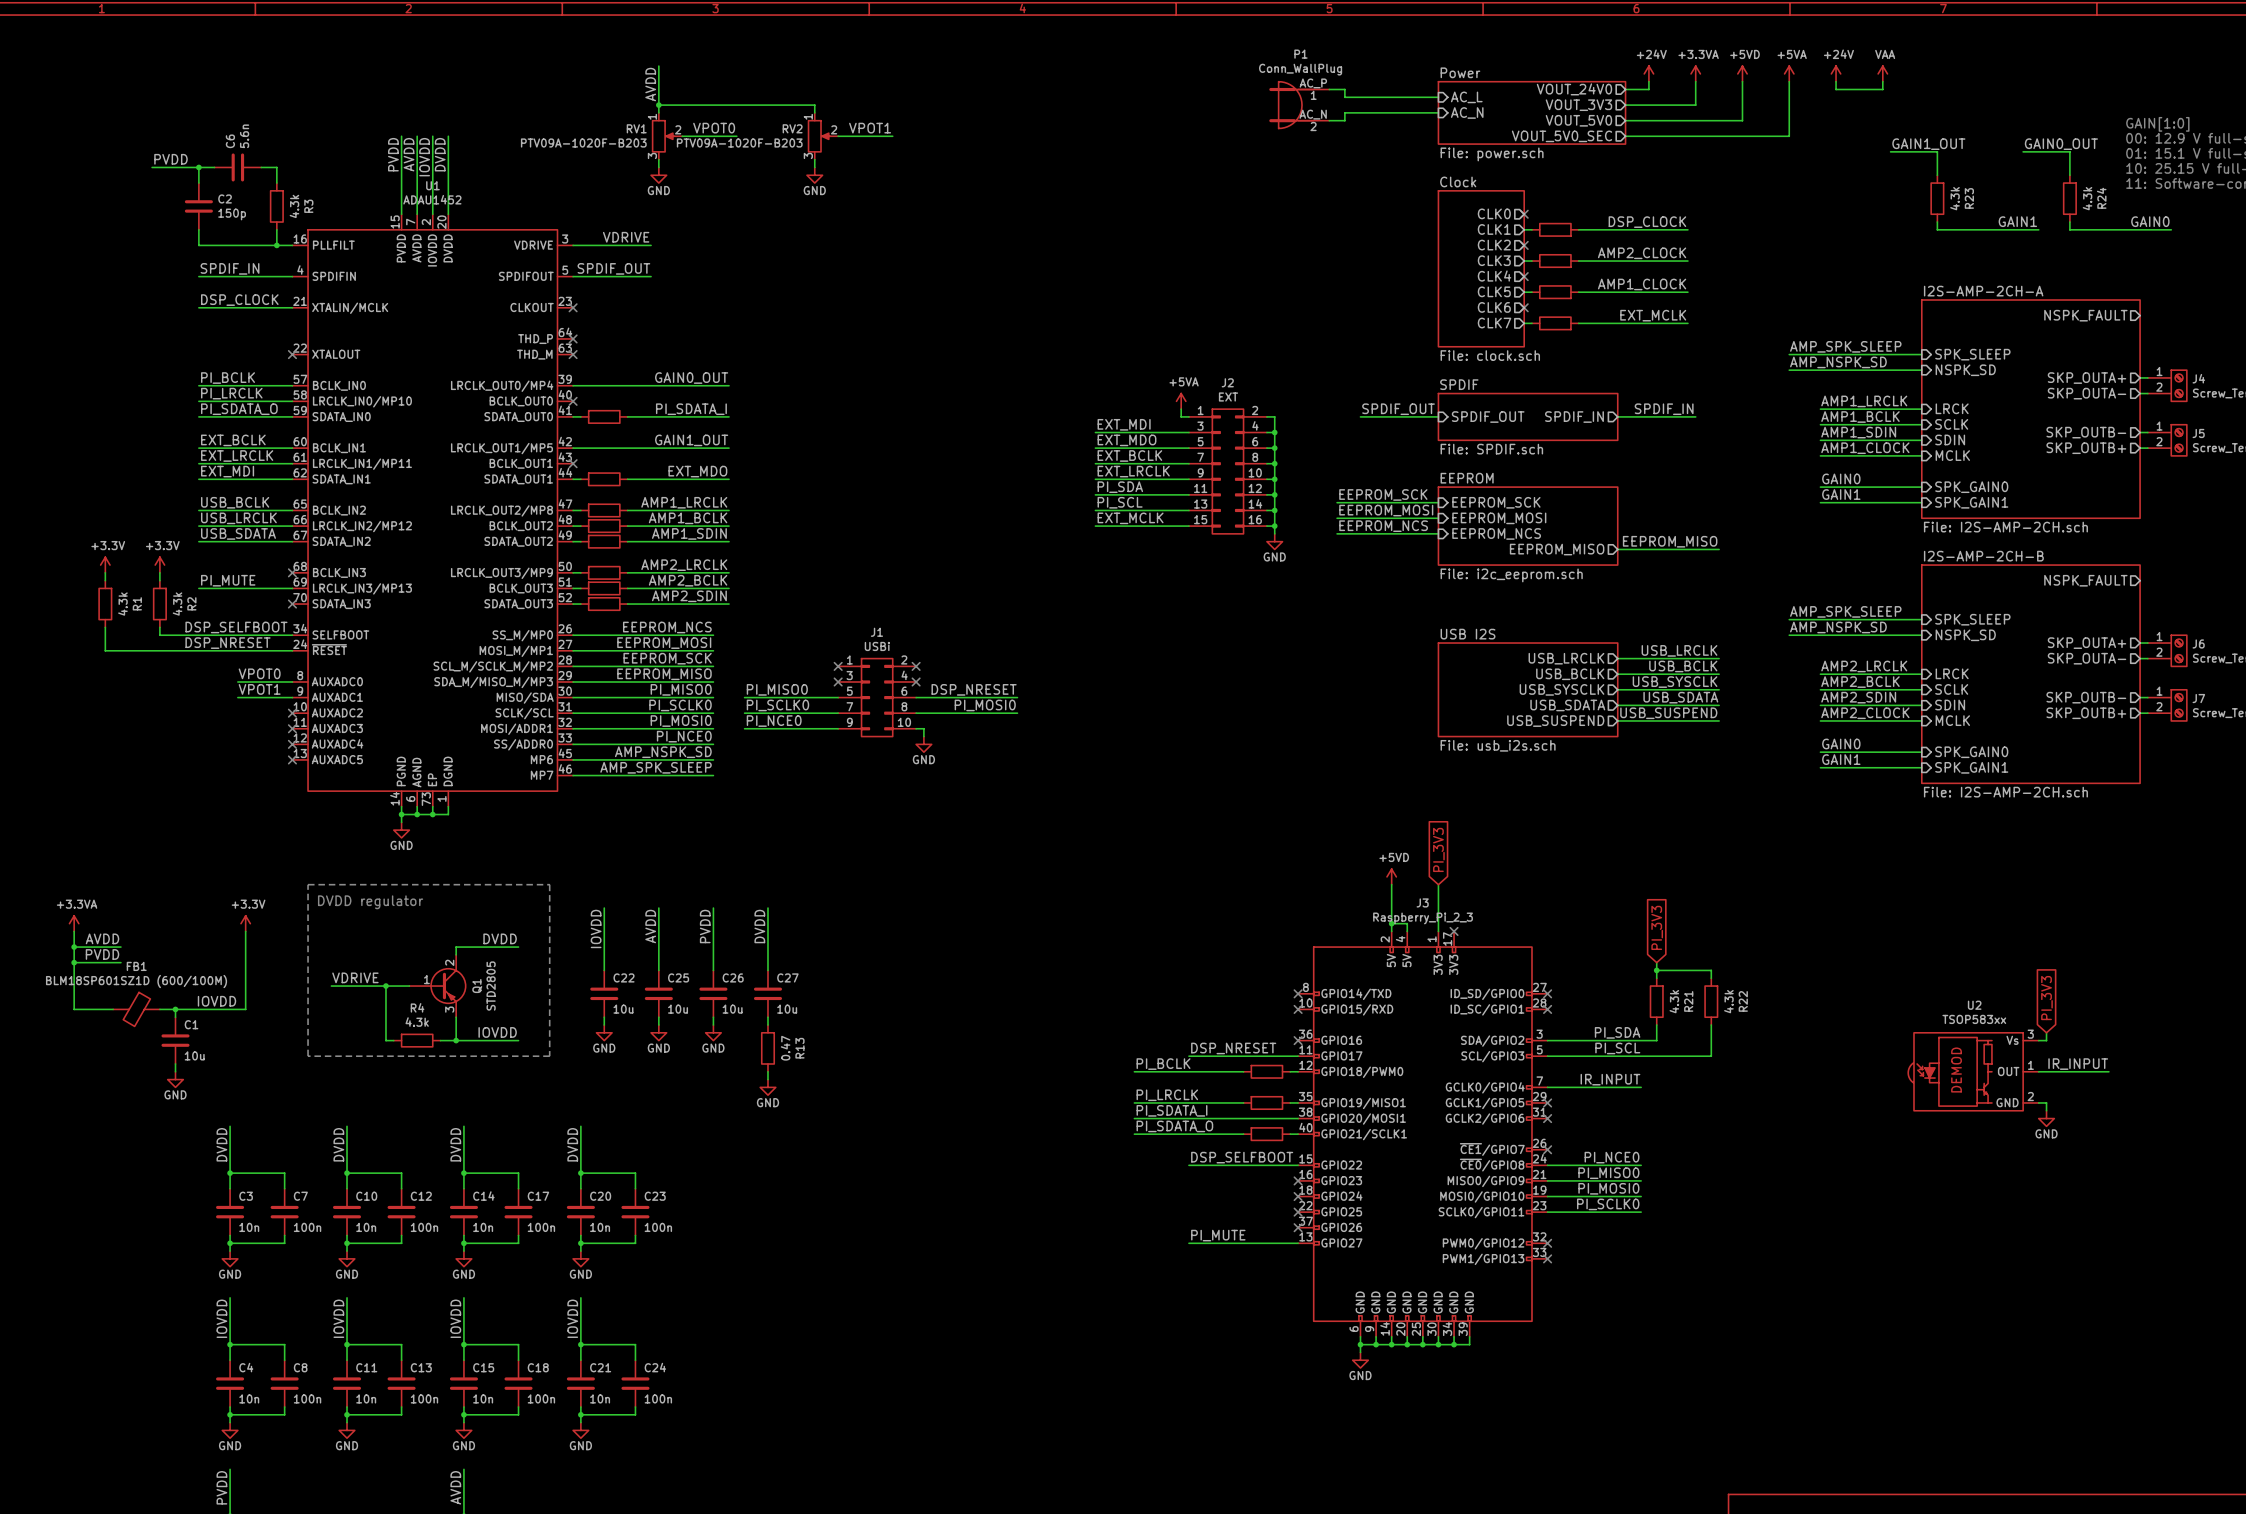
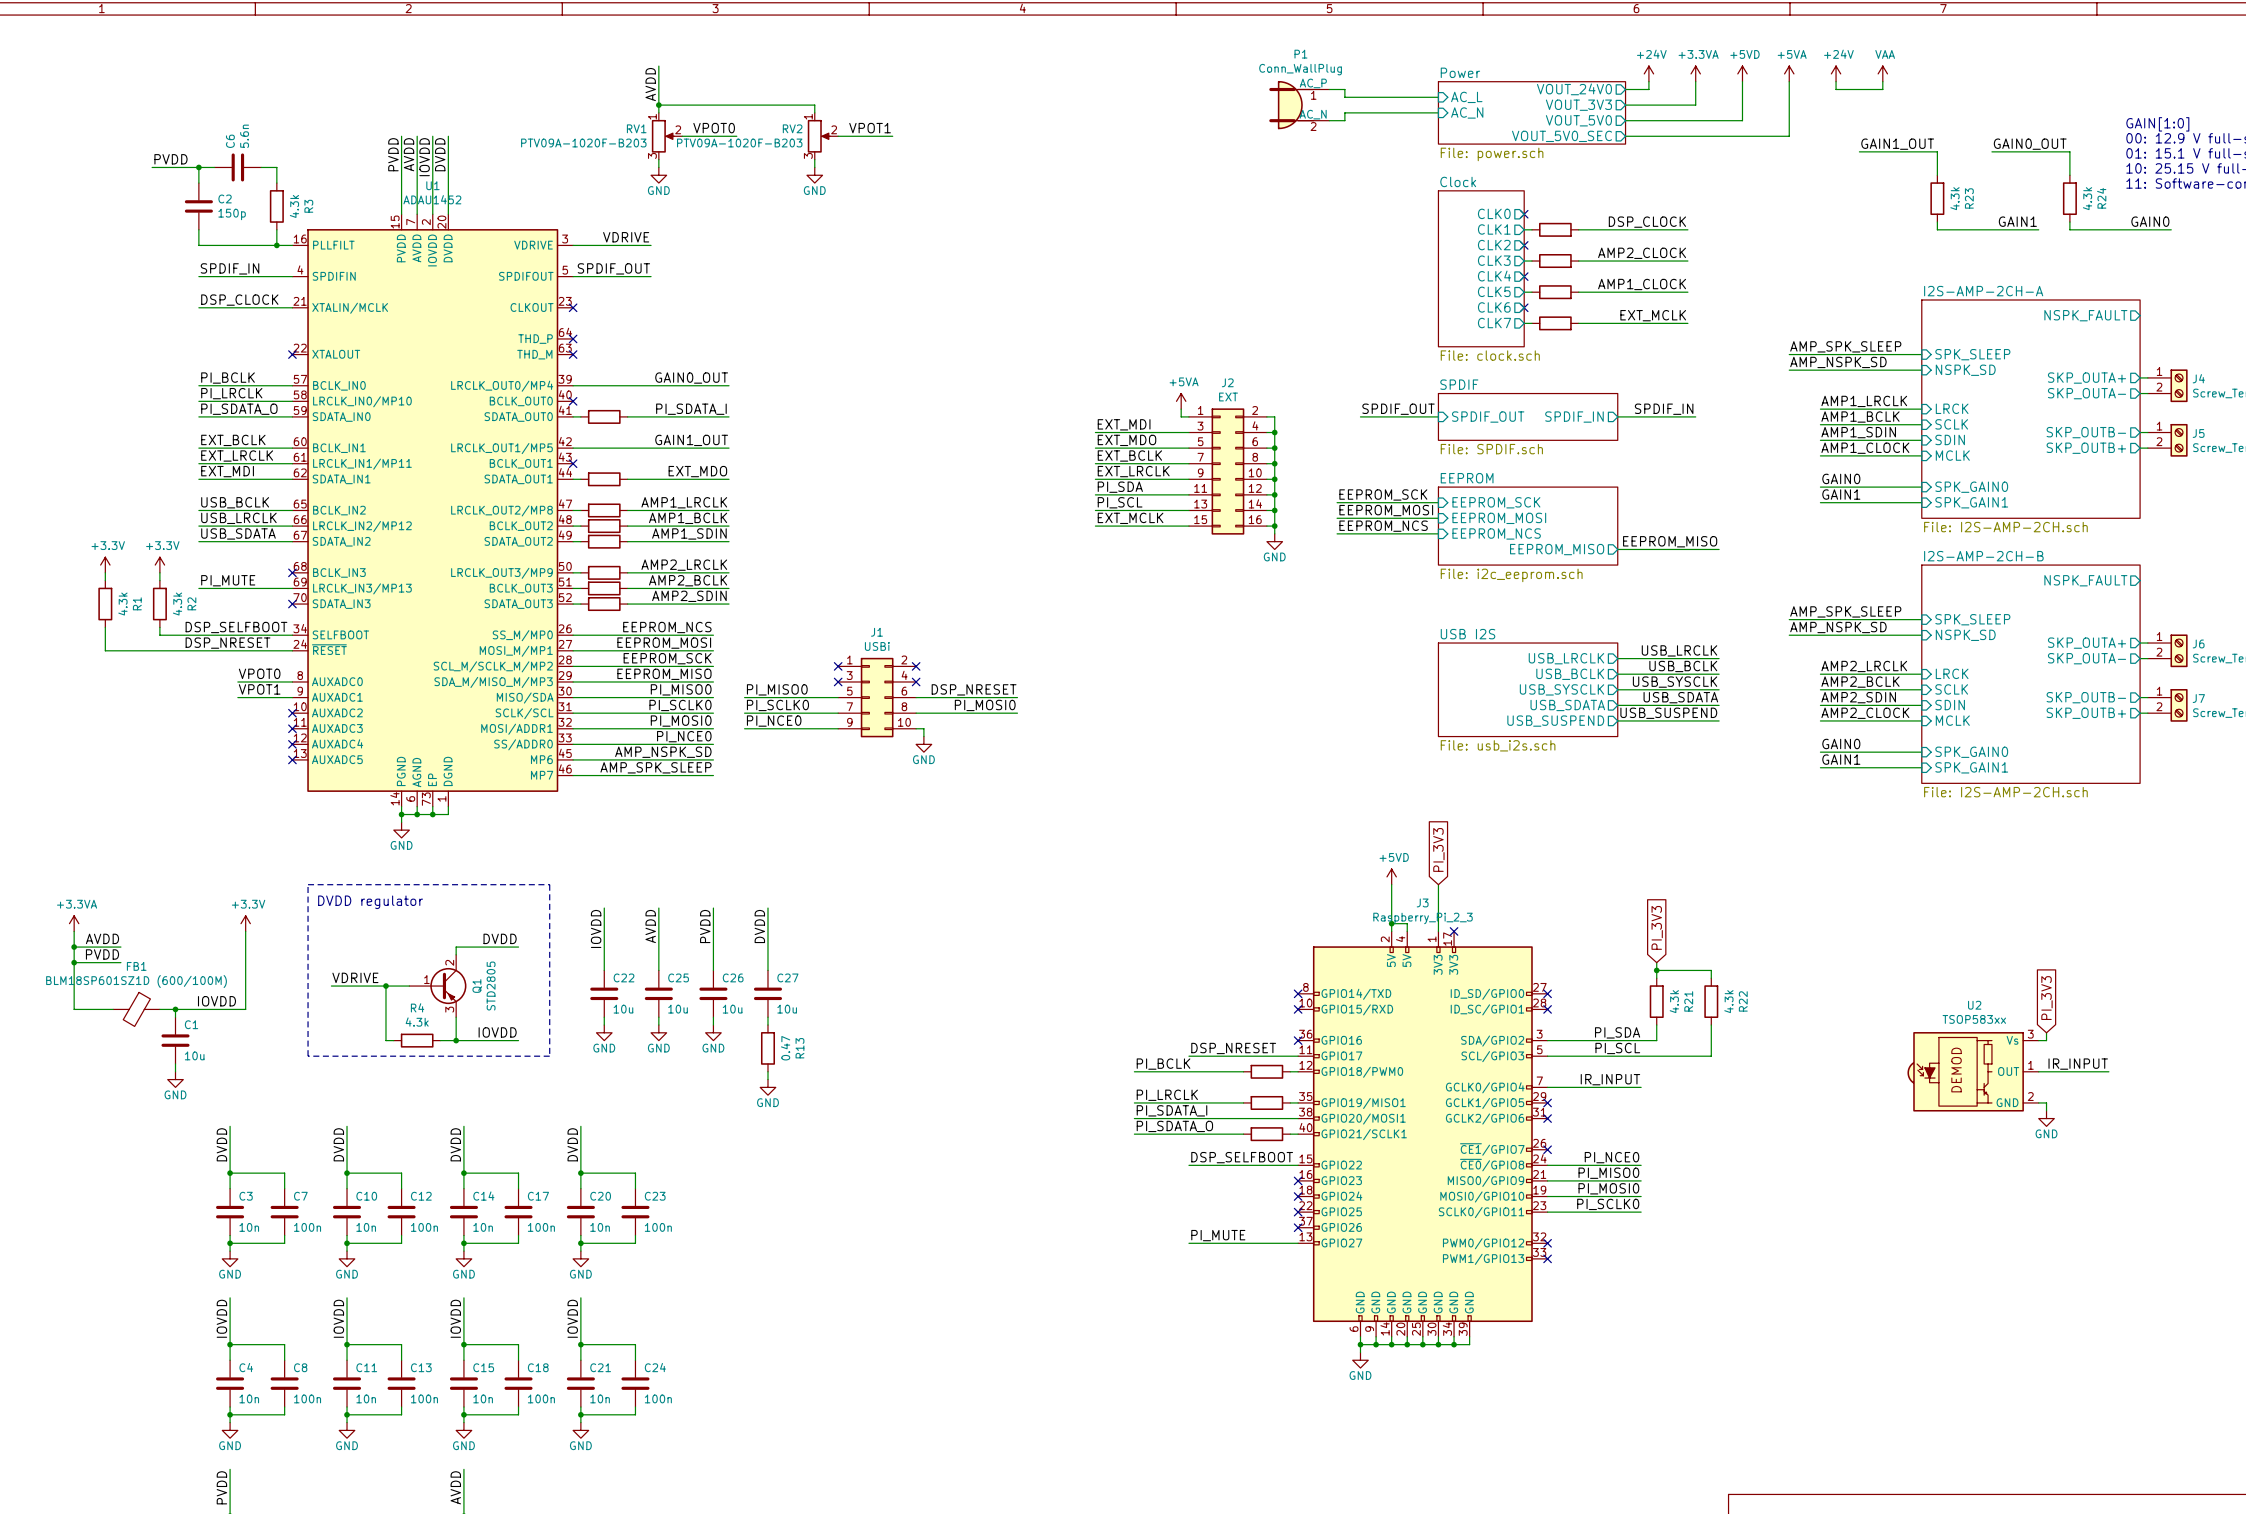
label position: GAIN1_OUT (1928, 144) -> GAIN1_OUT (1897, 144)
label position: GAIN0_OUT (2061, 144) -> GAIN0_OUT (2030, 144)
wire: none -> (1859, 151) (1890, 151)
wire: none -> (1991, 151) (2023, 151)

